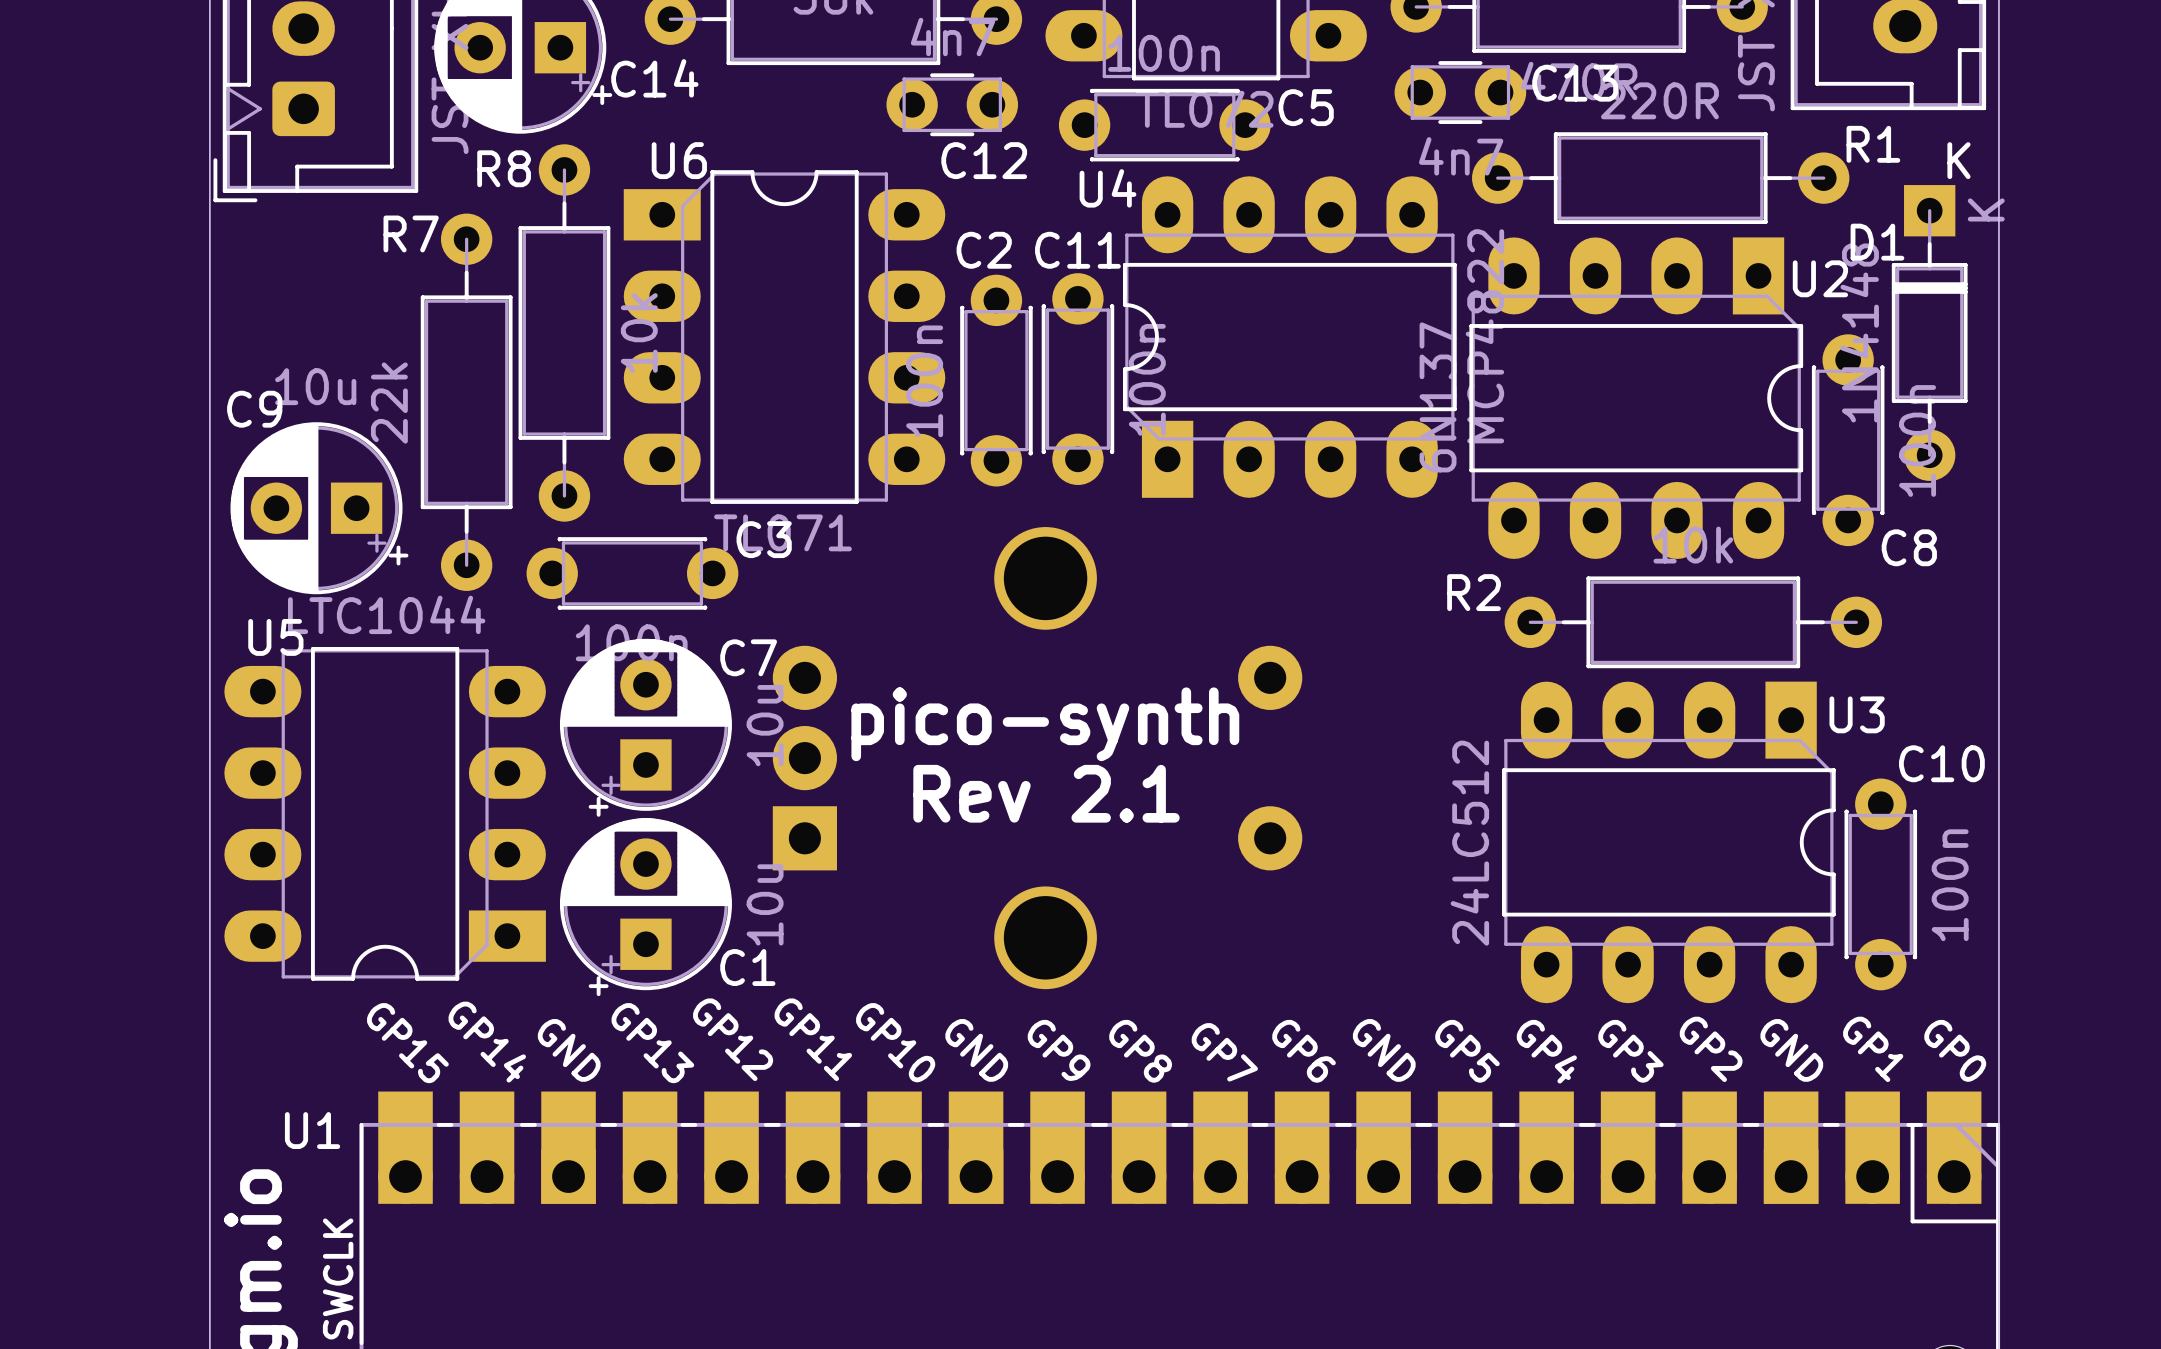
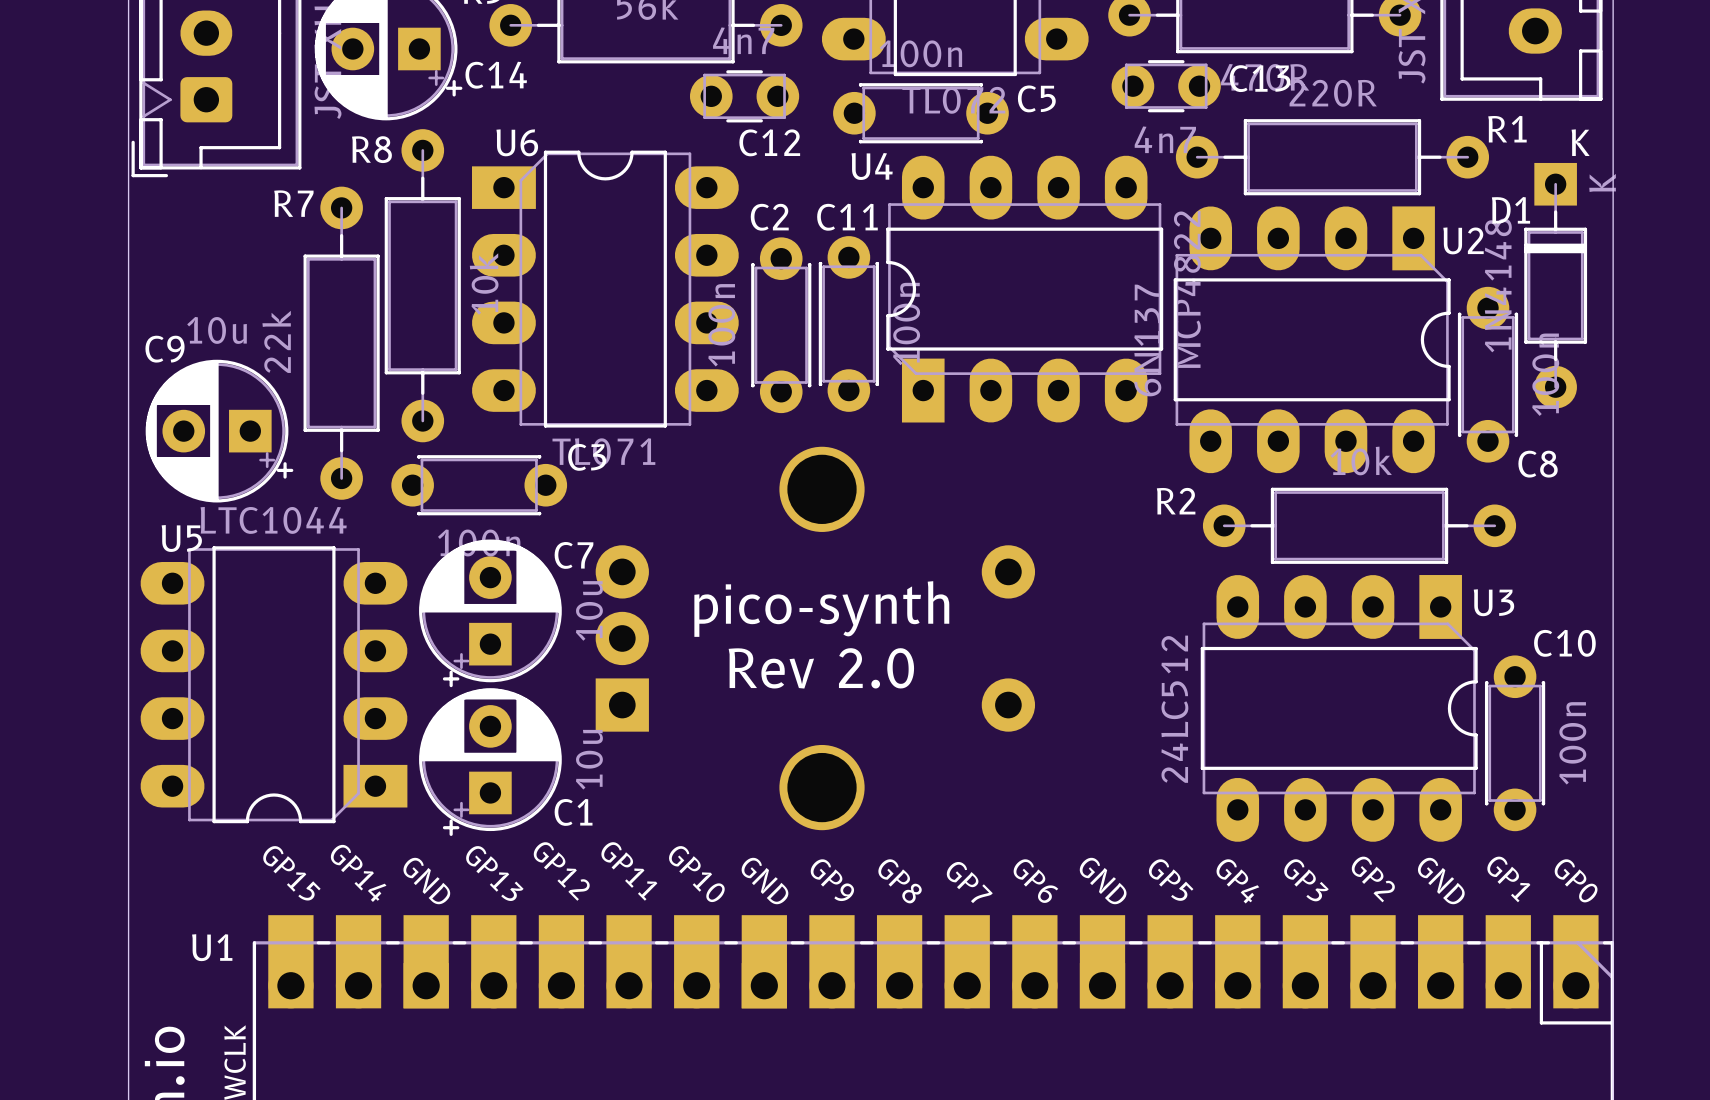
text: Rev 2.1 (1046, 793) -> Rev 2.0 (821, 668)

